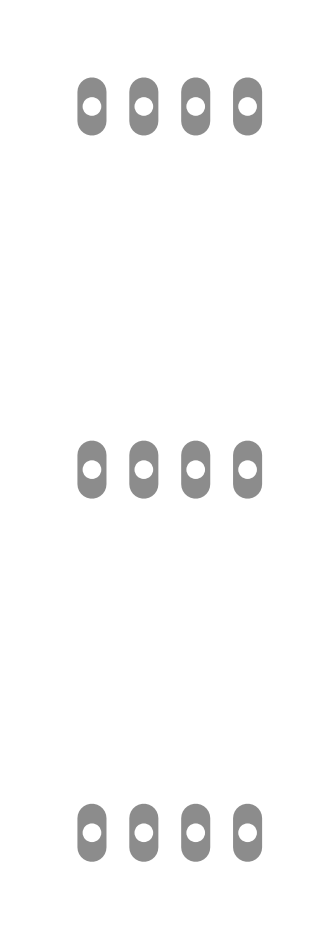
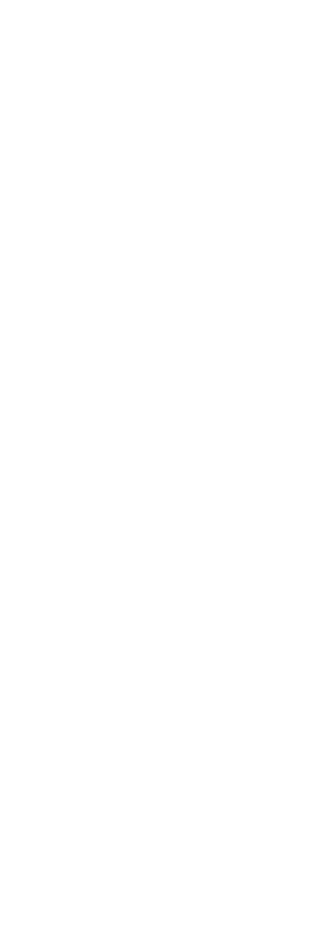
part: (169, 106) -> none
part: (169, 469) -> none
part: (169, 832) -> none

